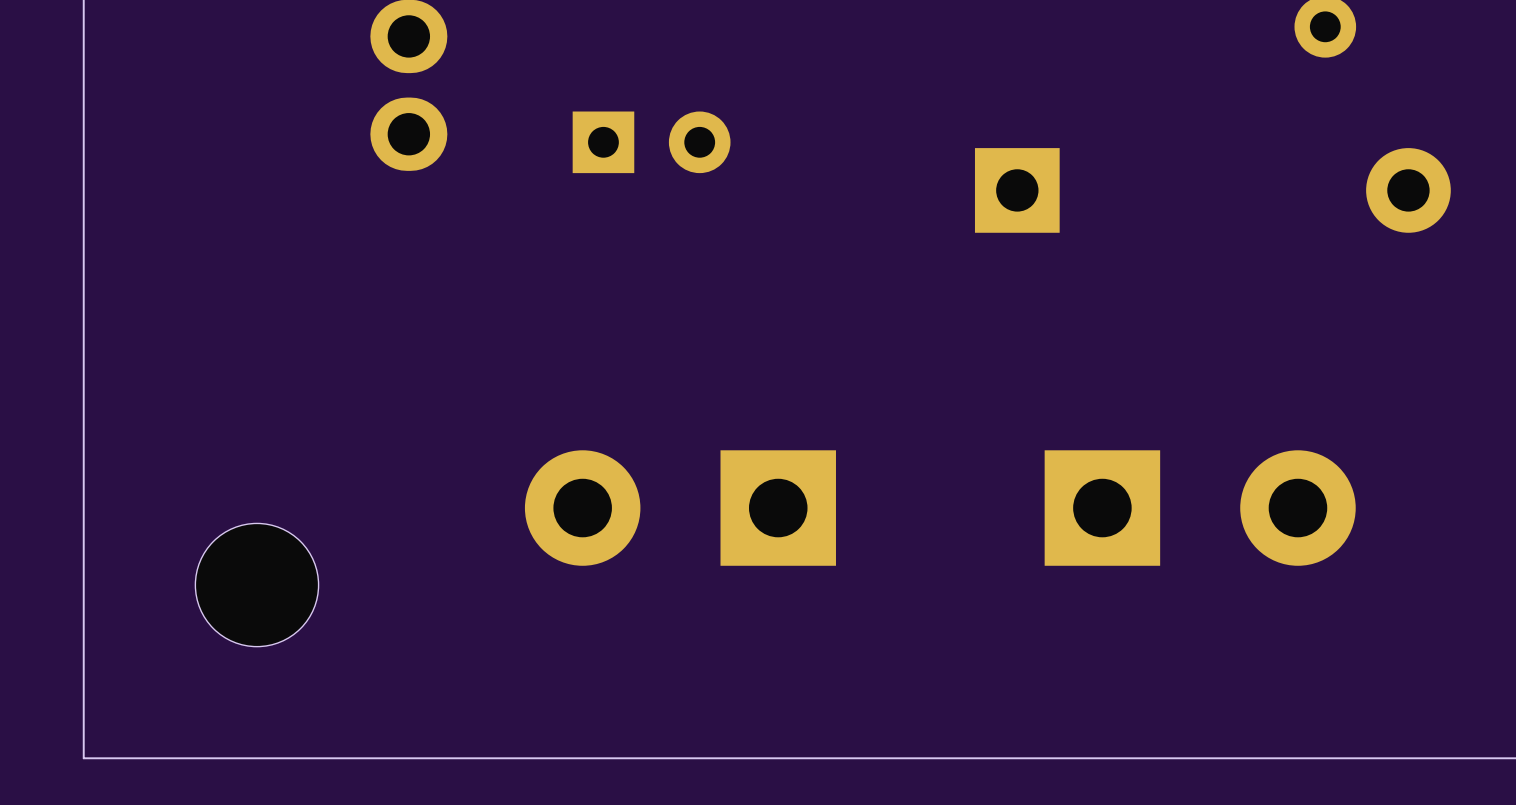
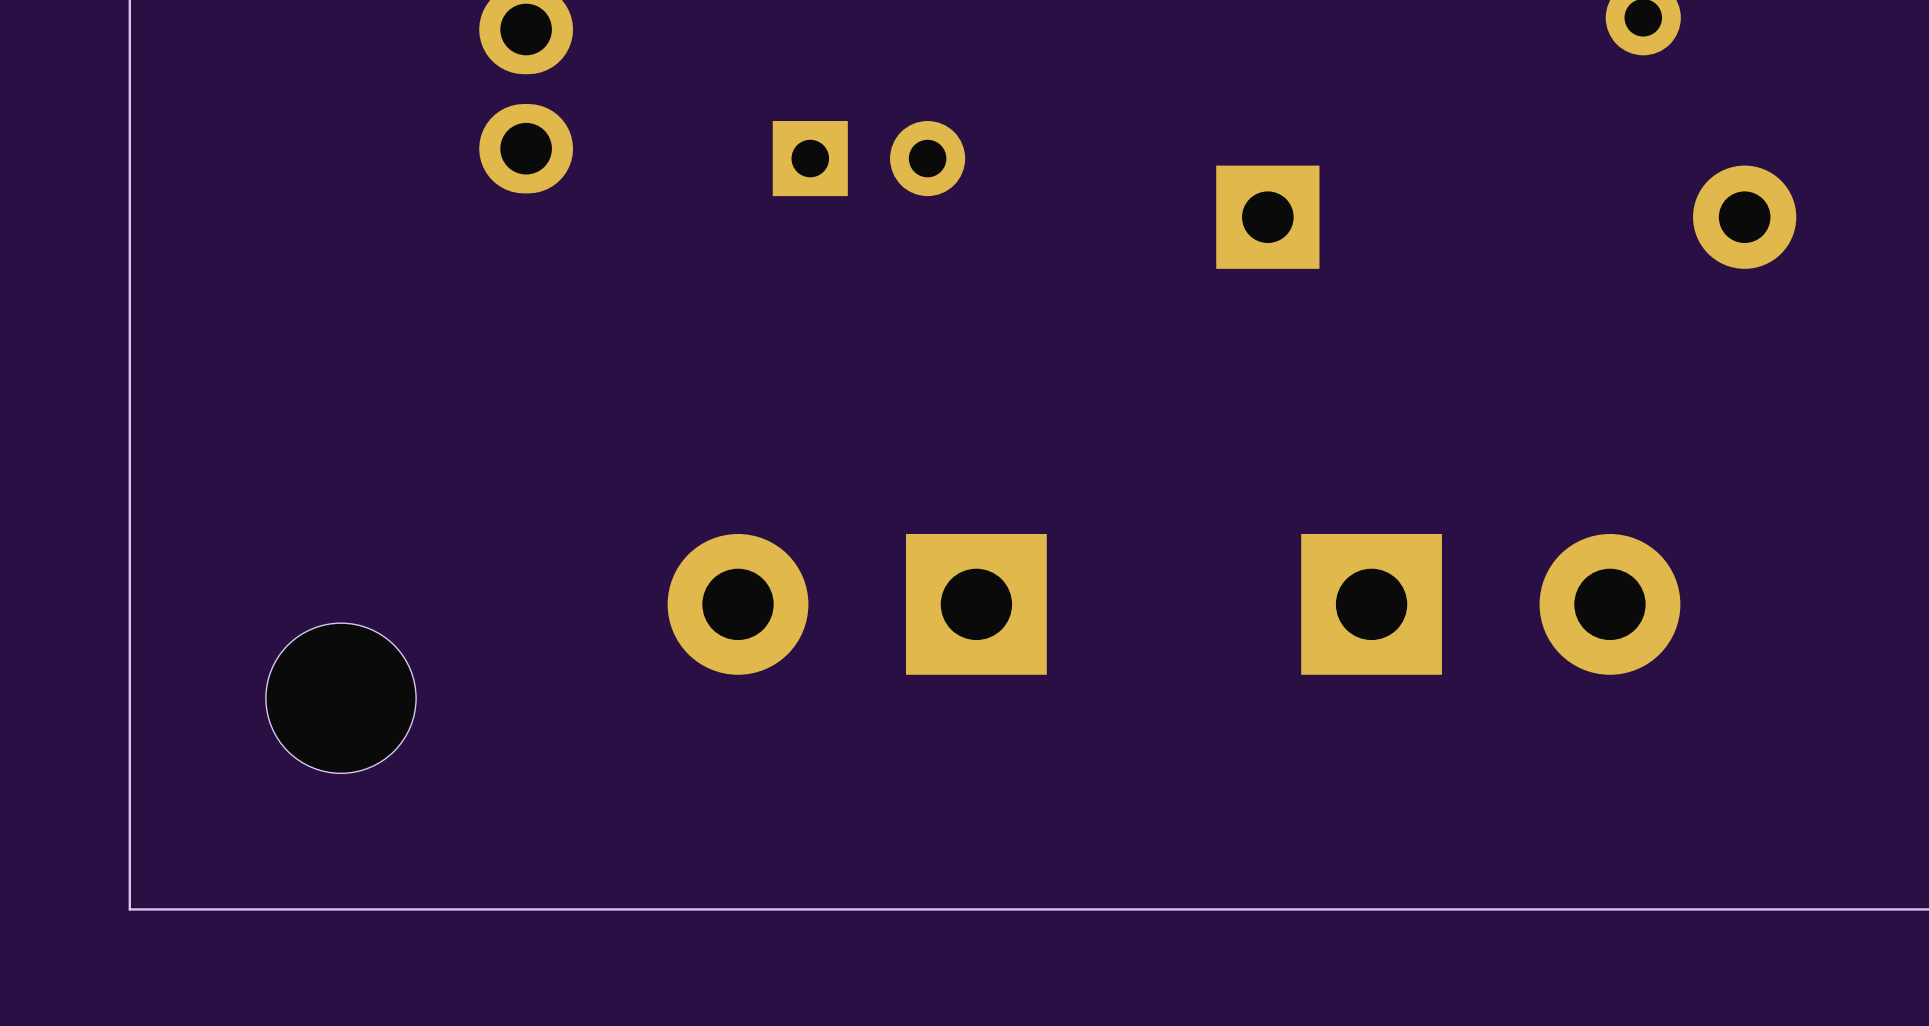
part position: (651, 142) -> (868, 158)

